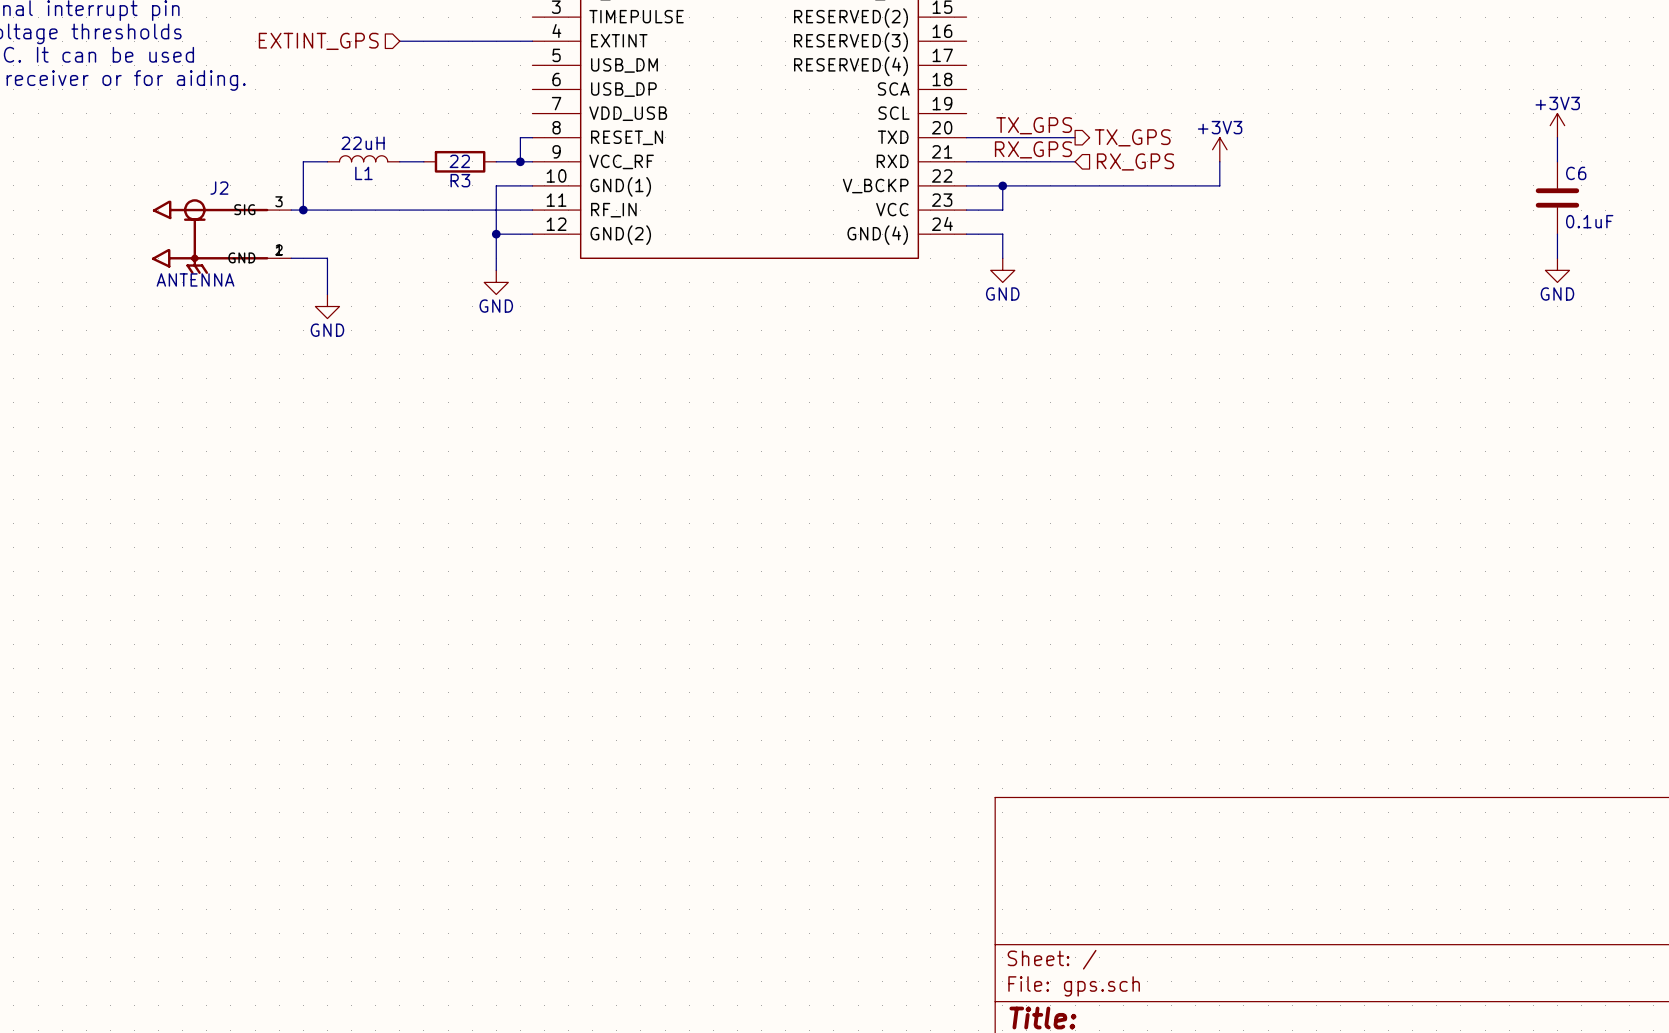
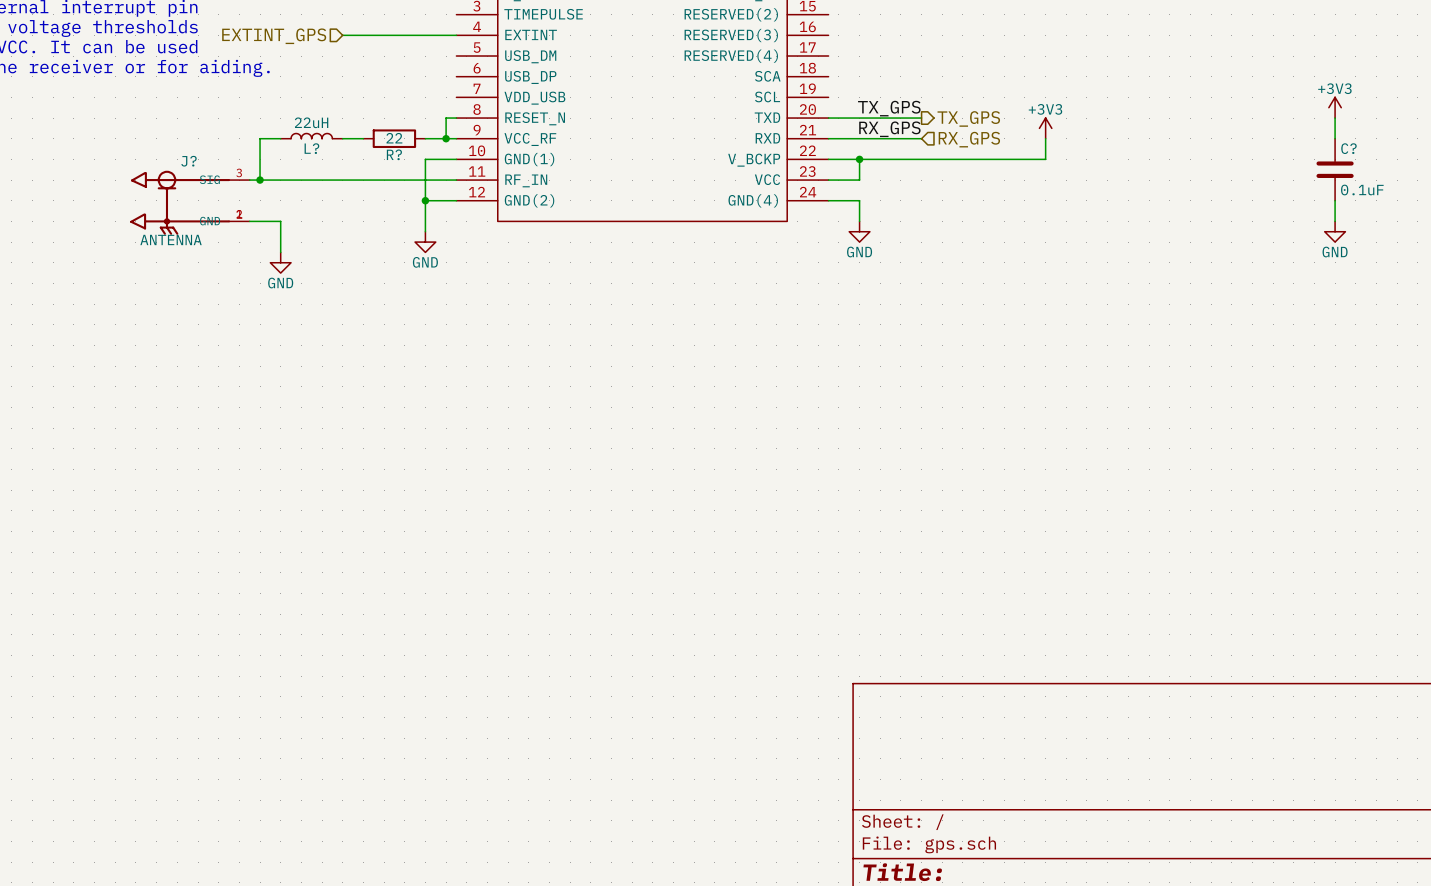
L1 name: L1 (363, 173) -> L? (311, 148)
C6 name: C6 (1576, 173) -> C? (1348, 148)
R3 name: R3 (460, 180) -> R? (394, 154)
J2 name: J2 (219, 188) -> J? (188, 161)

